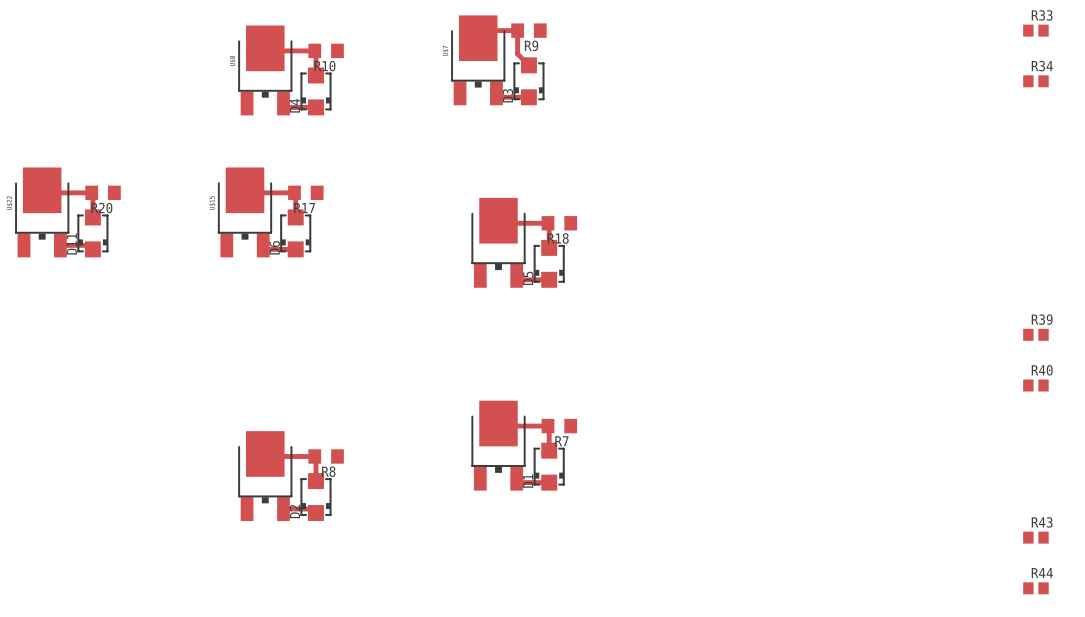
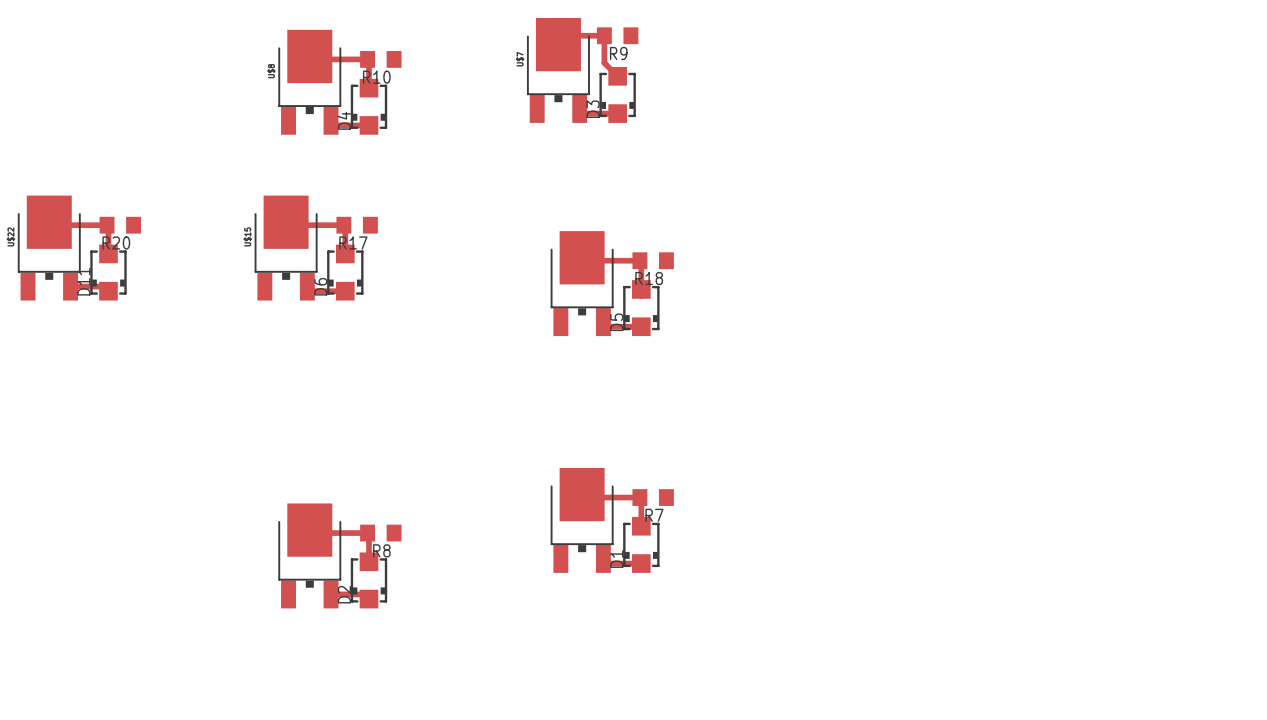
R33: (1035, 30) -> none
R34: (1035, 81) -> none
R39: (1035, 334) -> none
R40: (1035, 385) -> none
R43: (1035, 537) -> none
R44: (1035, 588) -> none

